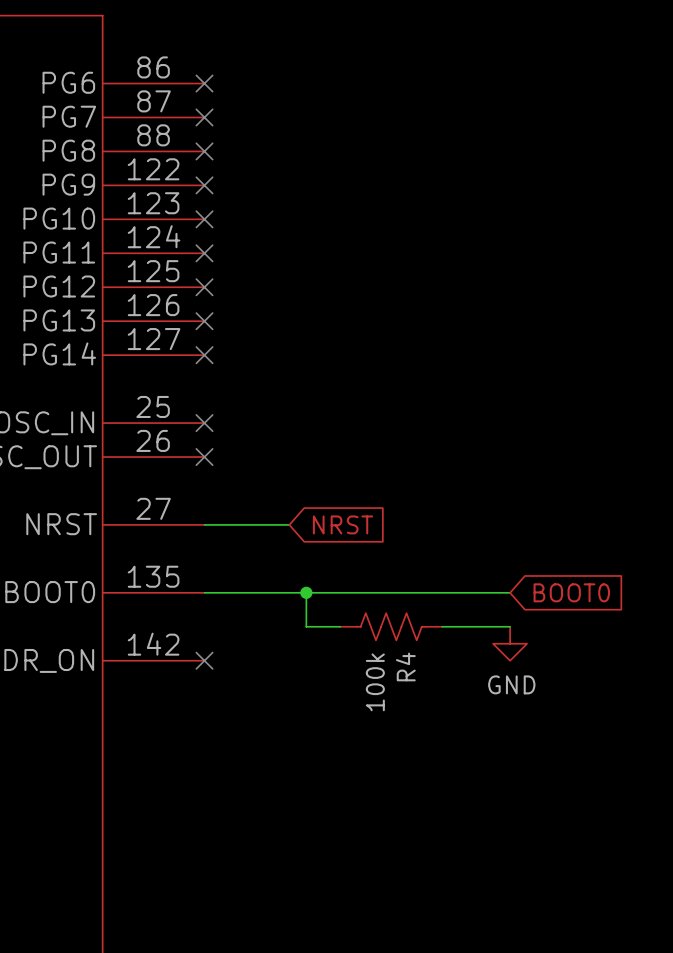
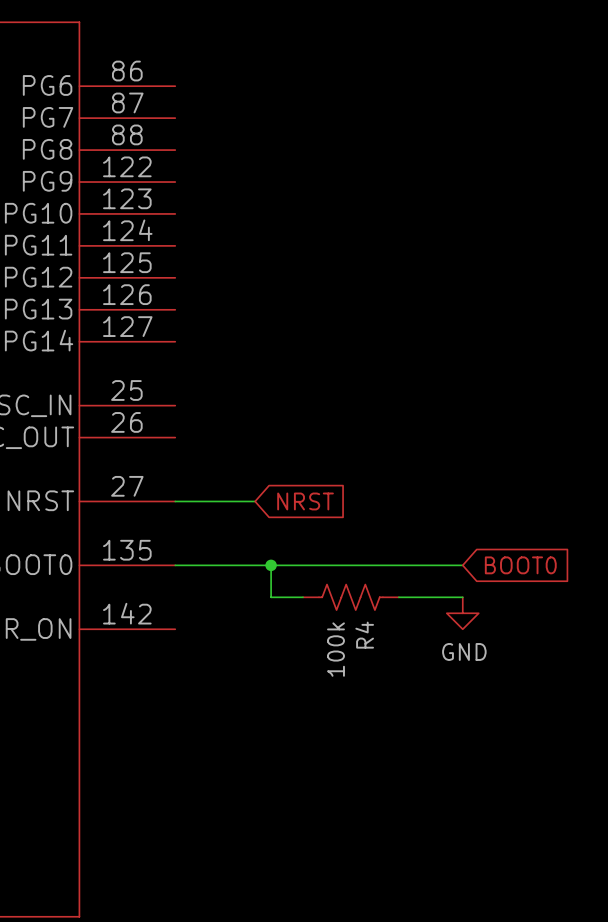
no-connect mark: (204, 83) -> none
no-connect mark: (204, 117) -> none
no-connect mark: (204, 151) -> none
no-connect mark: (204, 185) -> none
no-connect mark: (204, 219) -> none
no-connect mark: (204, 253) -> none
no-connect mark: (204, 287) -> none
no-connect mark: (204, 321) -> none
no-connect mark: (204, 355) -> none
no-connect mark: (204, 423) -> none
no-connect mark: (204, 457) -> none
no-connect mark: (204, 660) -> none

